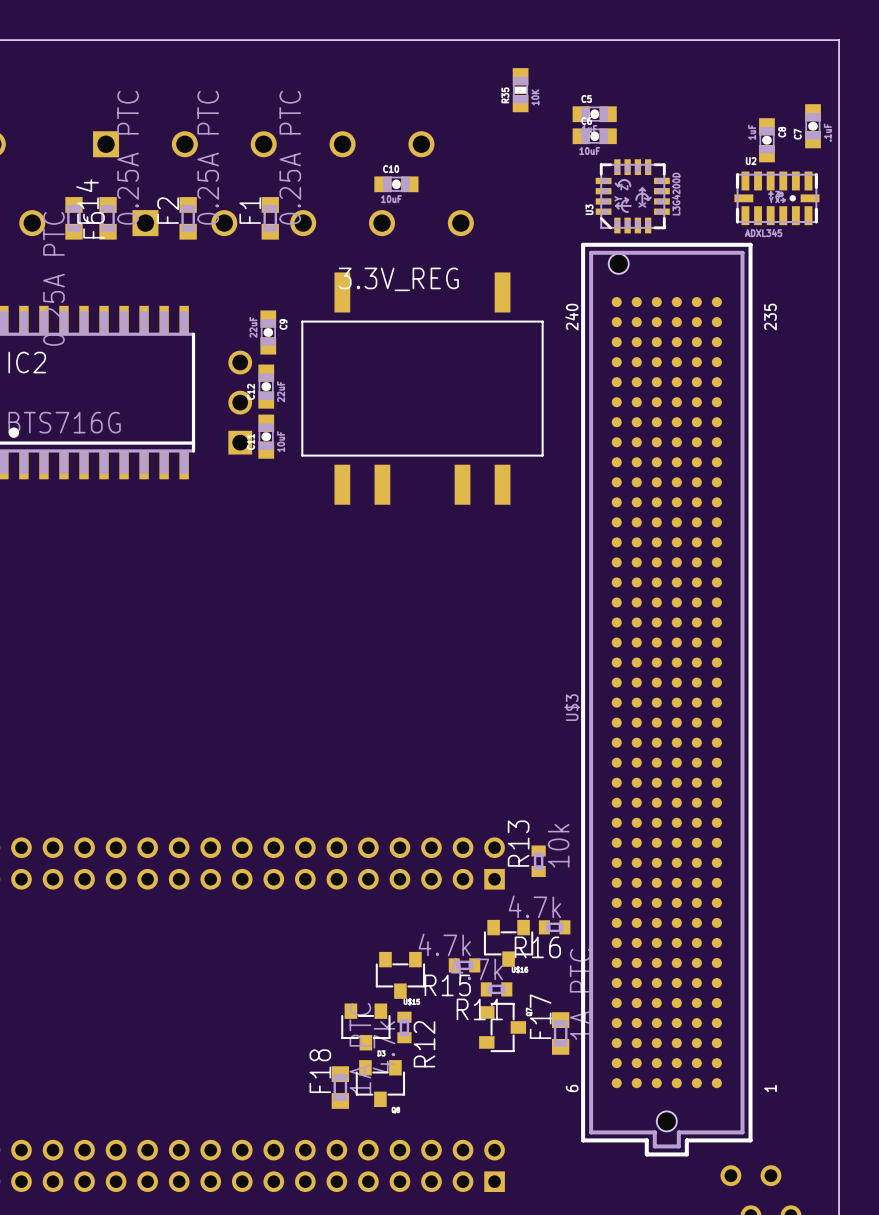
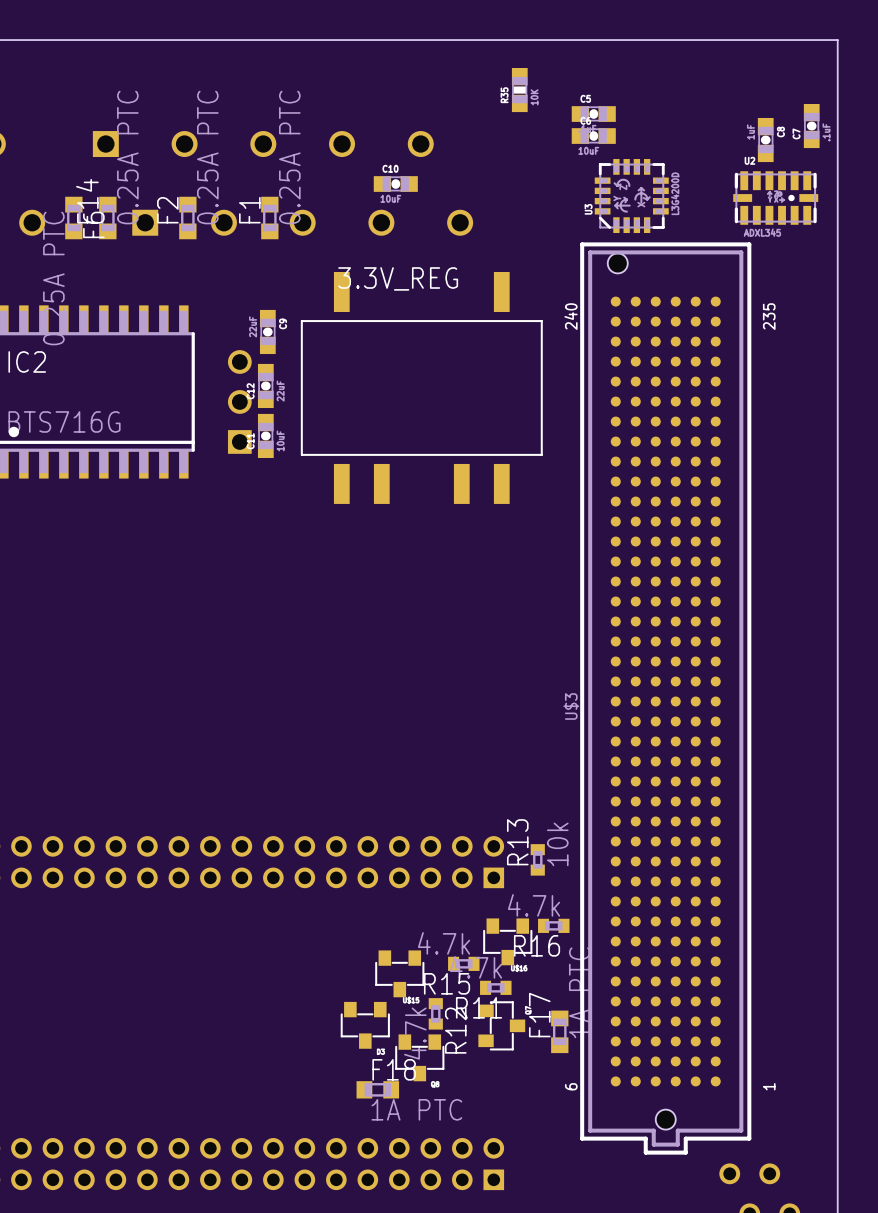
R12 position: (404, 1027) -> (435, 1013)
part position: (380, 1083) -> (419, 1057)
F18 rotation: 0° (340, 1087) -> 90° clockwise (377, 1089)
F18 position: (340, 1087) -> (377, 1089)

